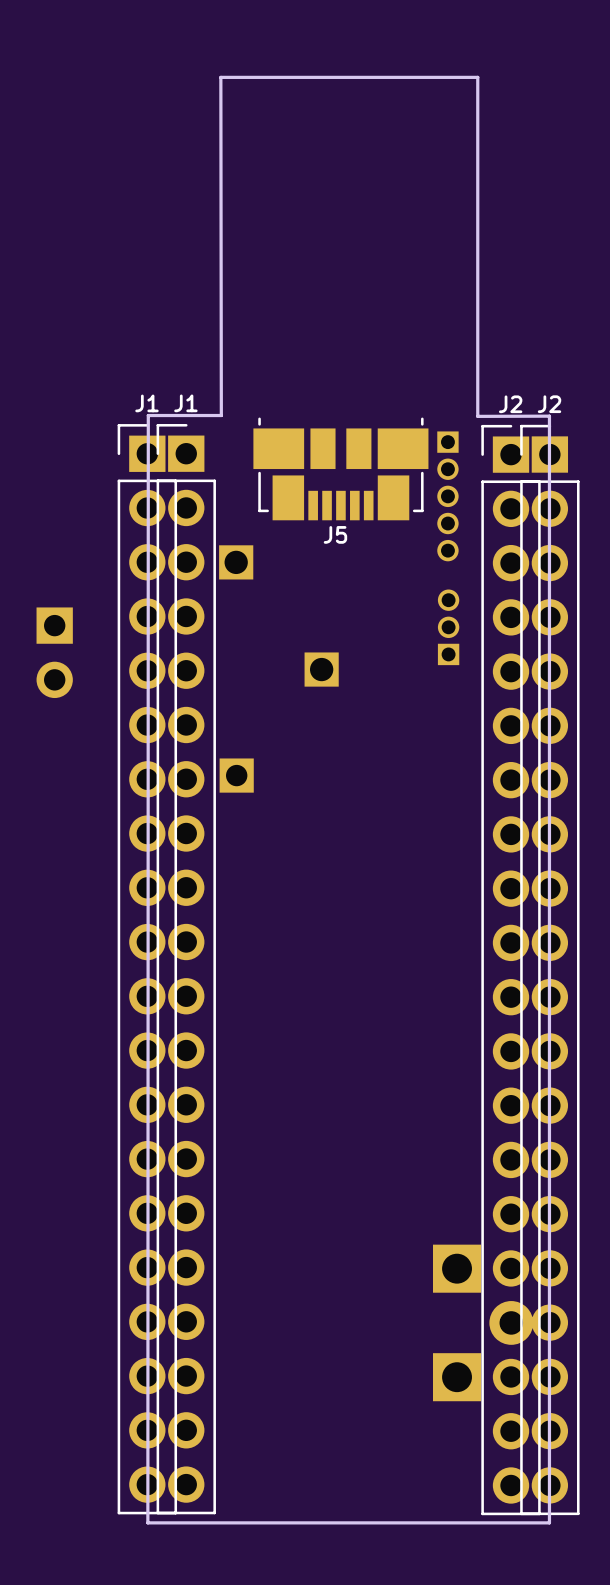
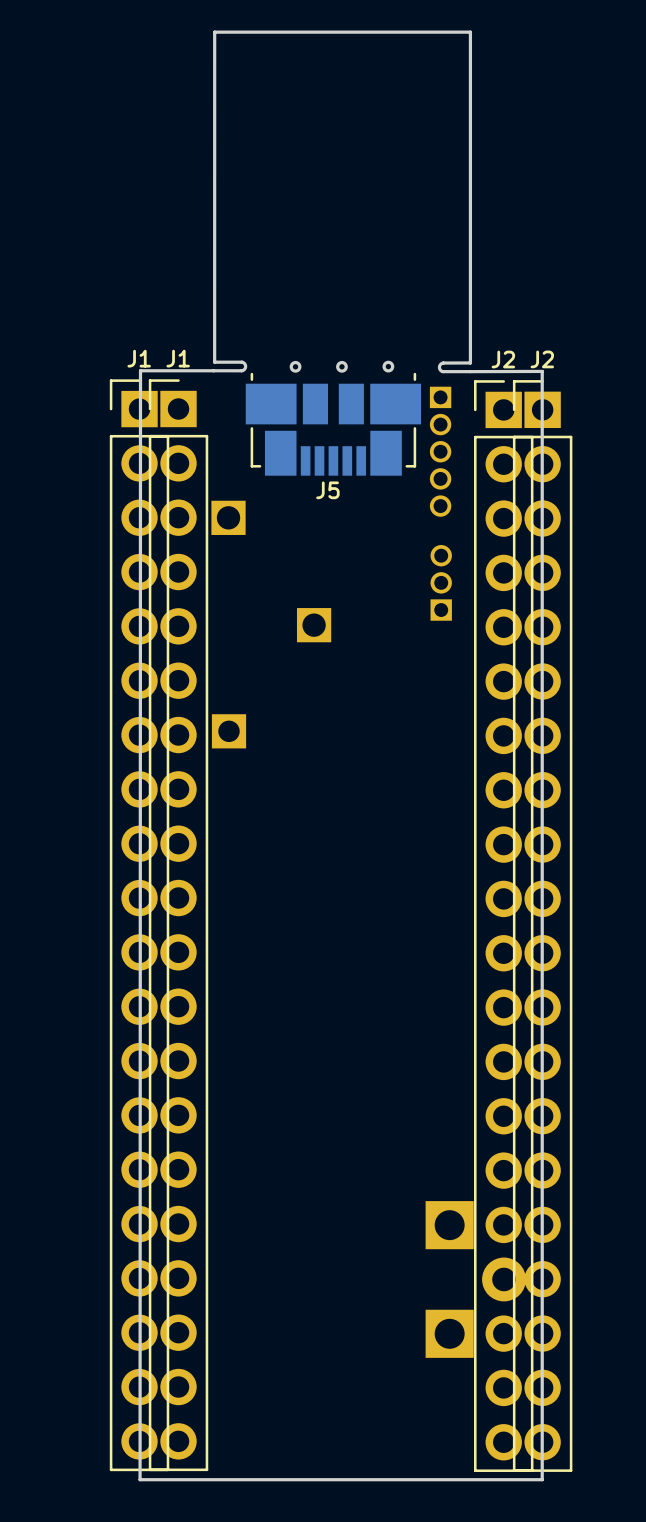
board edge: (222, 77) (220, 77) (221, 415) -> (214, 32) (214, 362) (241, 362) (245, 366) (241, 370) (213, 370)
round board edge: none -> [289, 360, 302, 373]
round board edge: none -> [336, 360, 348, 373]
round board edge: none -> [382, 360, 395, 373]
board edge: (477, 407) (477, 416) -> (470, 362) (443, 363) (439, 367) (443, 371) (470, 371)
part: (54, 652) -> none

